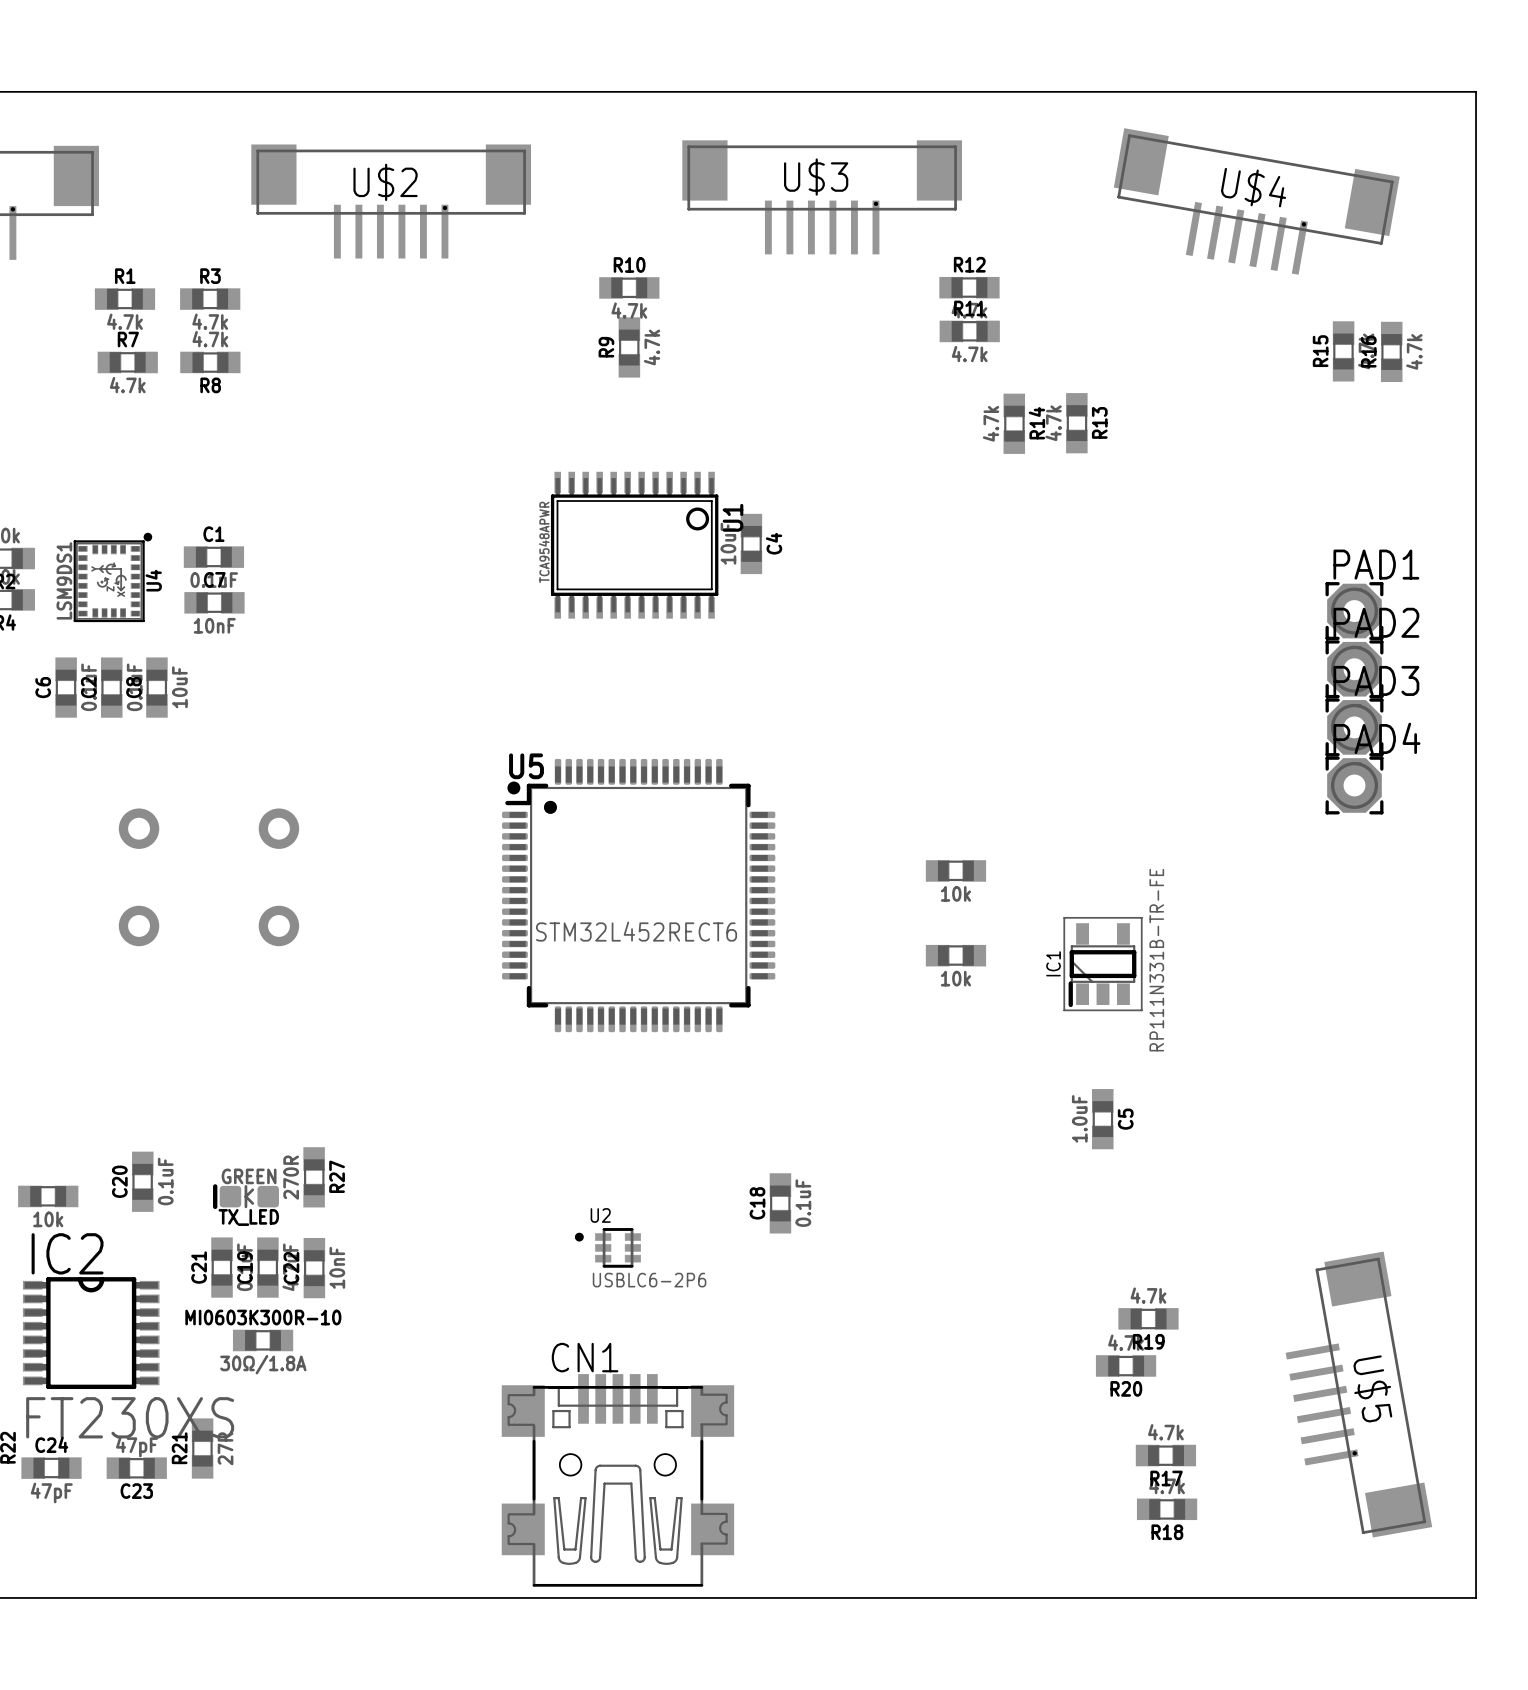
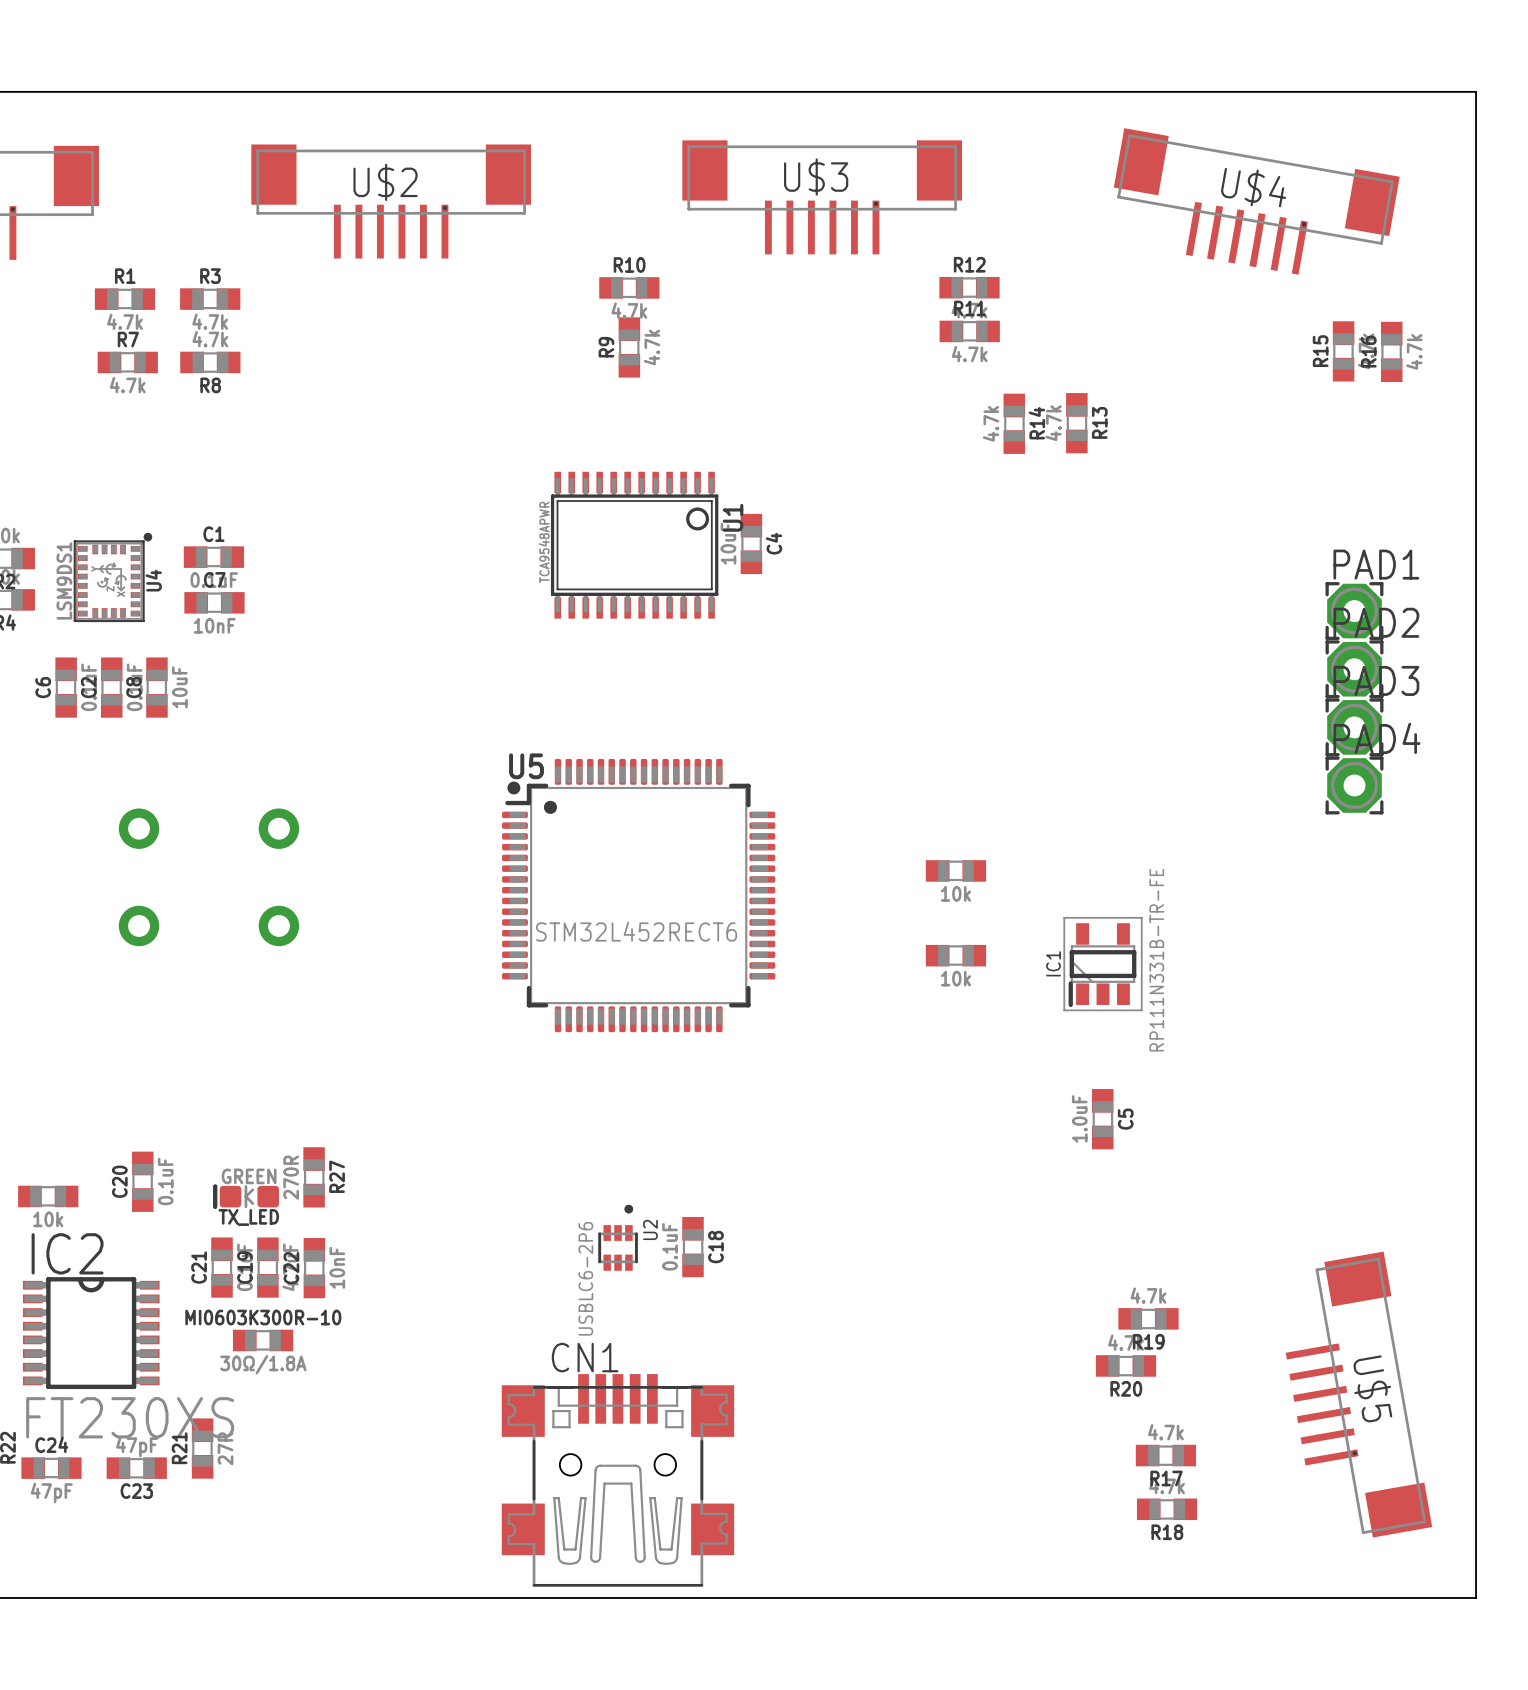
C18 name position: C18 (757, 1203) -> C18 (715, 1247)
C18 position: (780, 1203) -> (692, 1247)
C18 value position: 0.1uF (803, 1203) -> 0.1uF (670, 1246)
U2 rotation: 0° (608, 1247) -> 90° clockwise (618, 1237)

